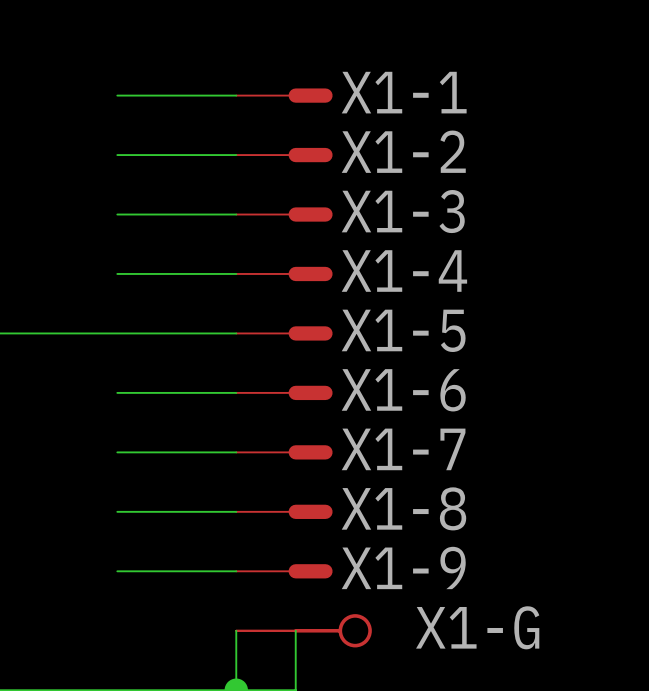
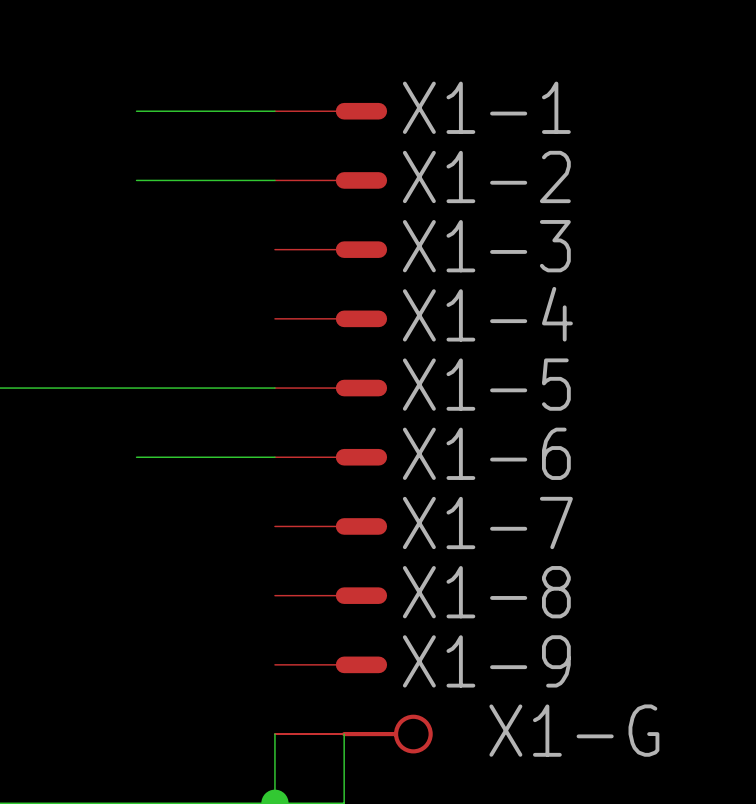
wire: (117, 214) (236, 214) -> none
wire: (117, 273) (236, 273) -> none
wire: (117, 452) (236, 452) -> none
wire: (117, 511) (236, 511) -> none
wire: (117, 571) (236, 571) -> none

